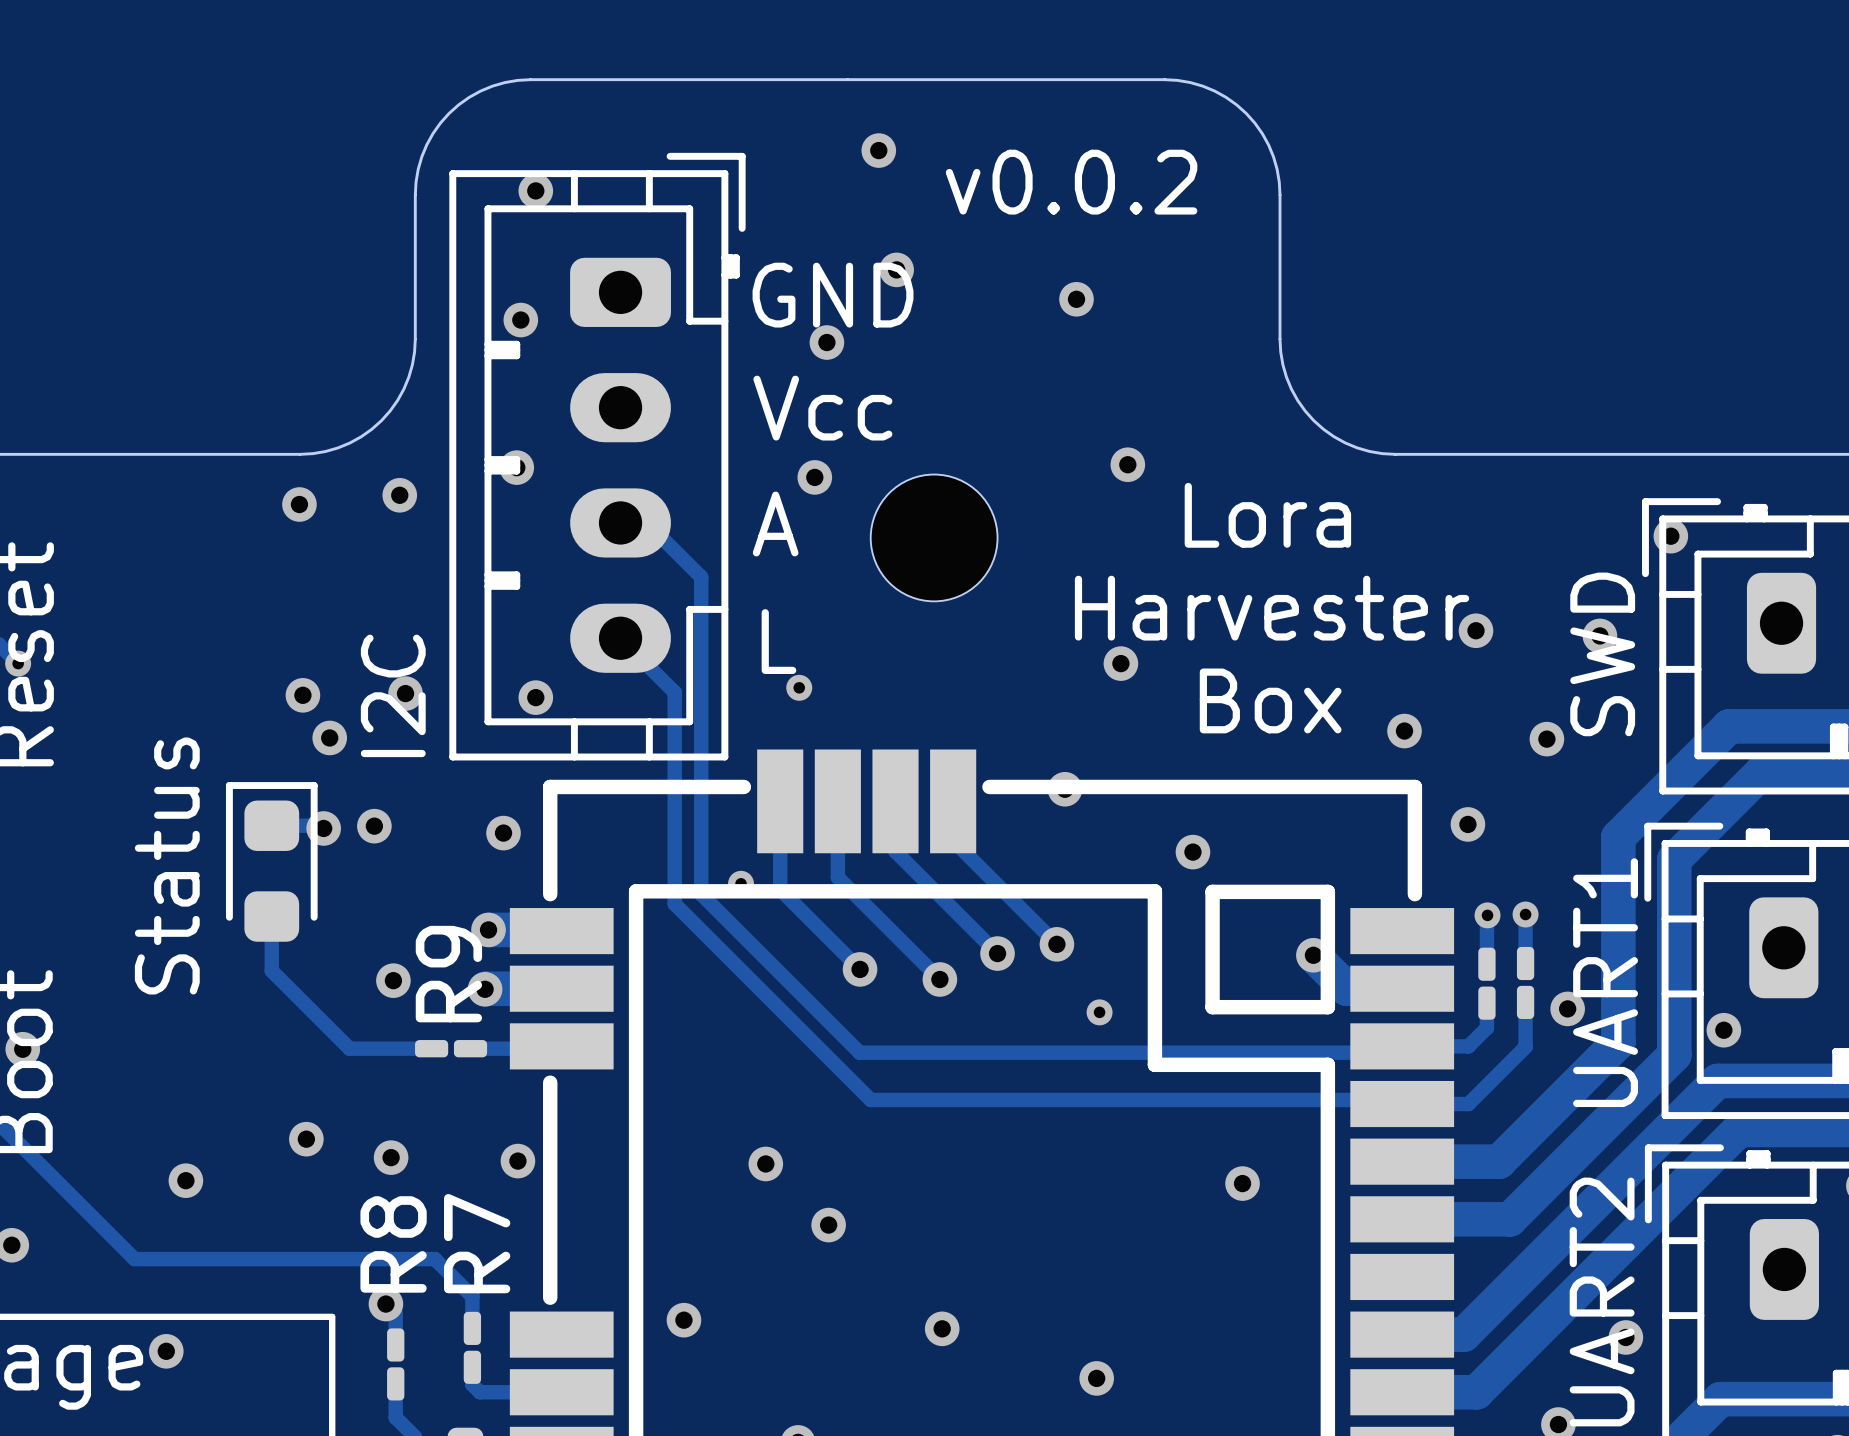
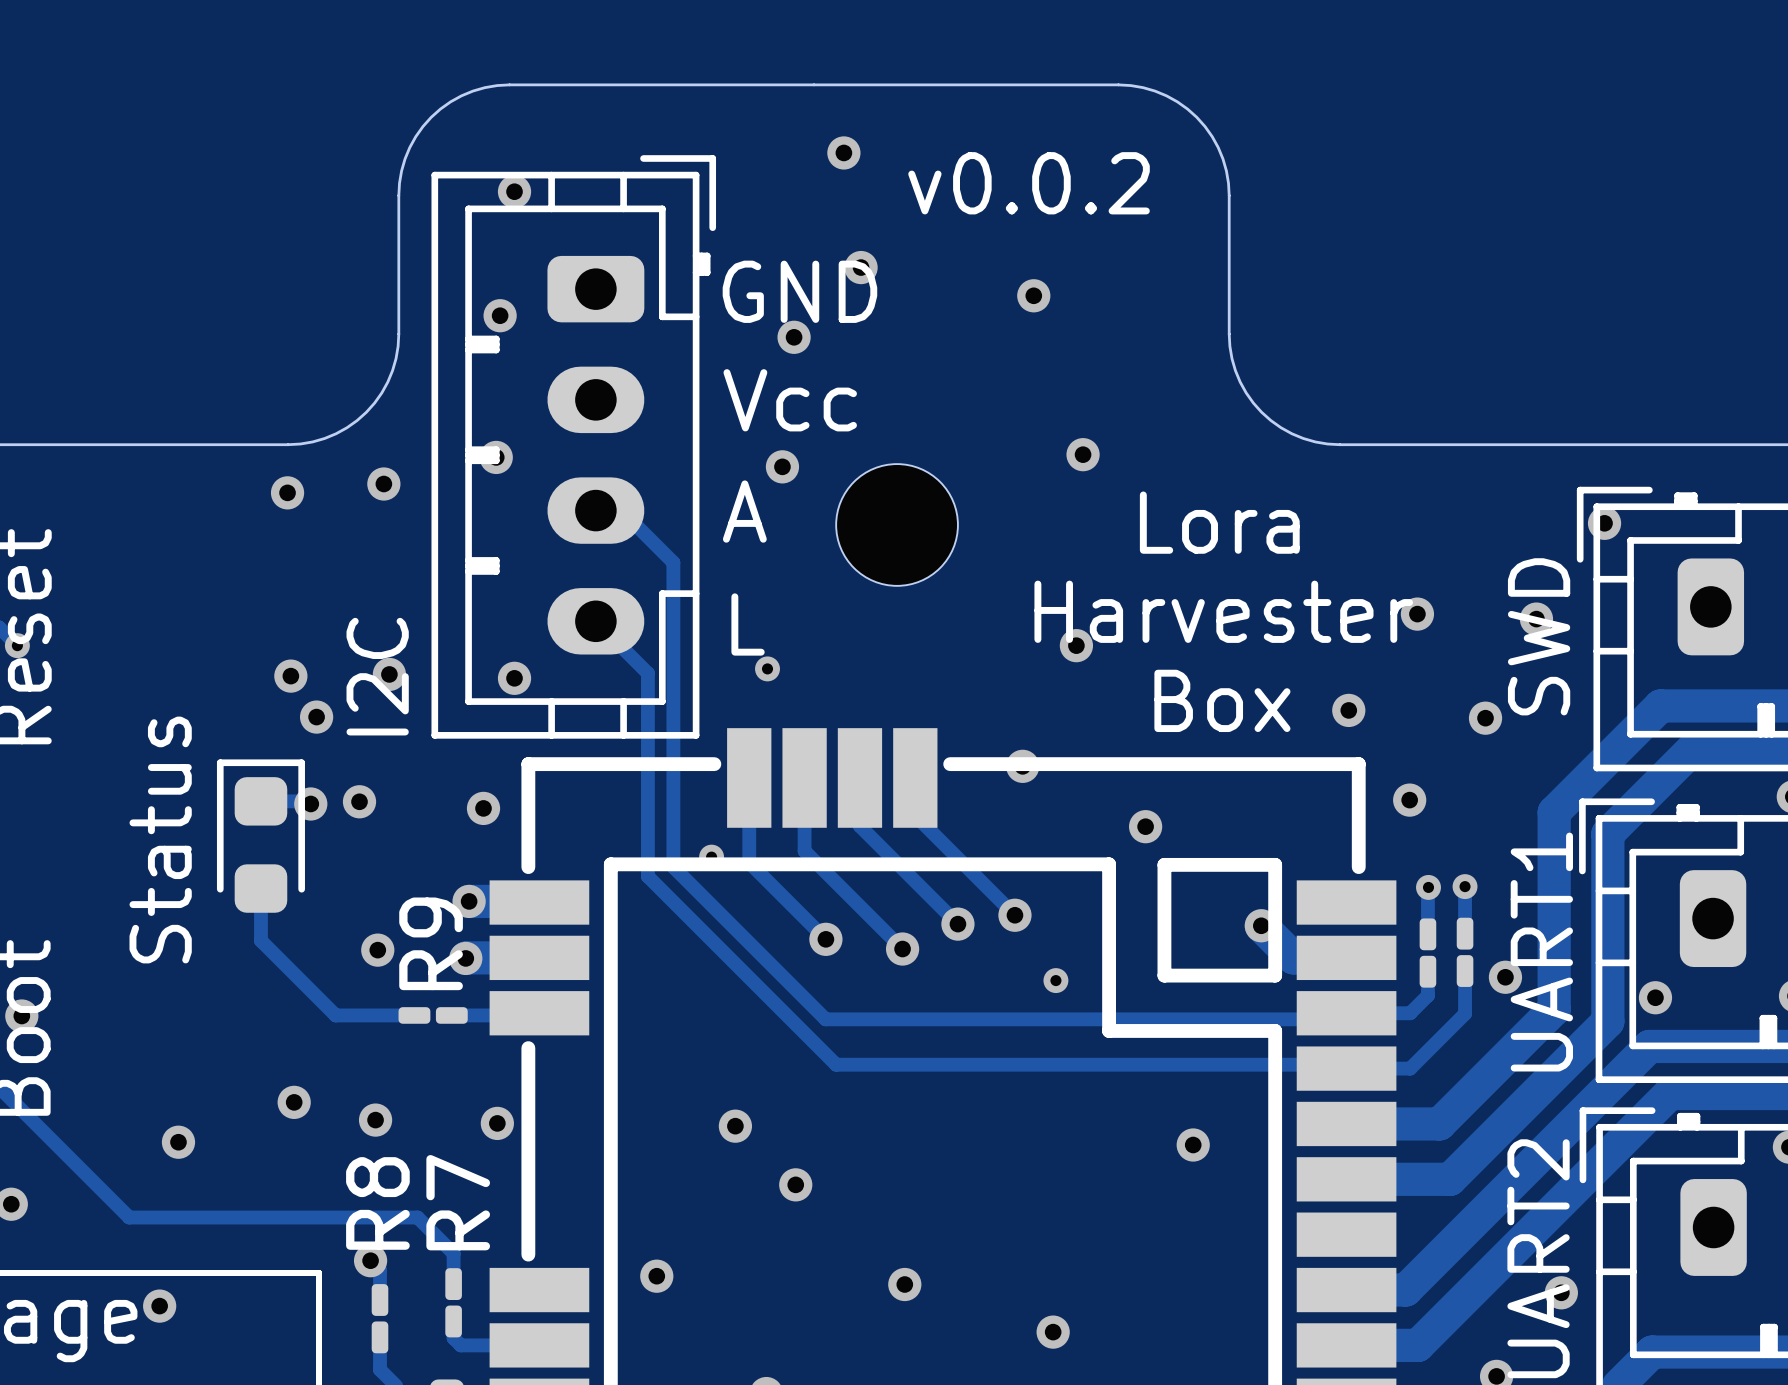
text position: Lora (1267, 515) -> Lora (1219, 522)
text position: Harvester (1272, 608) -> Harvester (1223, 611)
text position: Box (1270, 700) -> Box (1222, 700)

